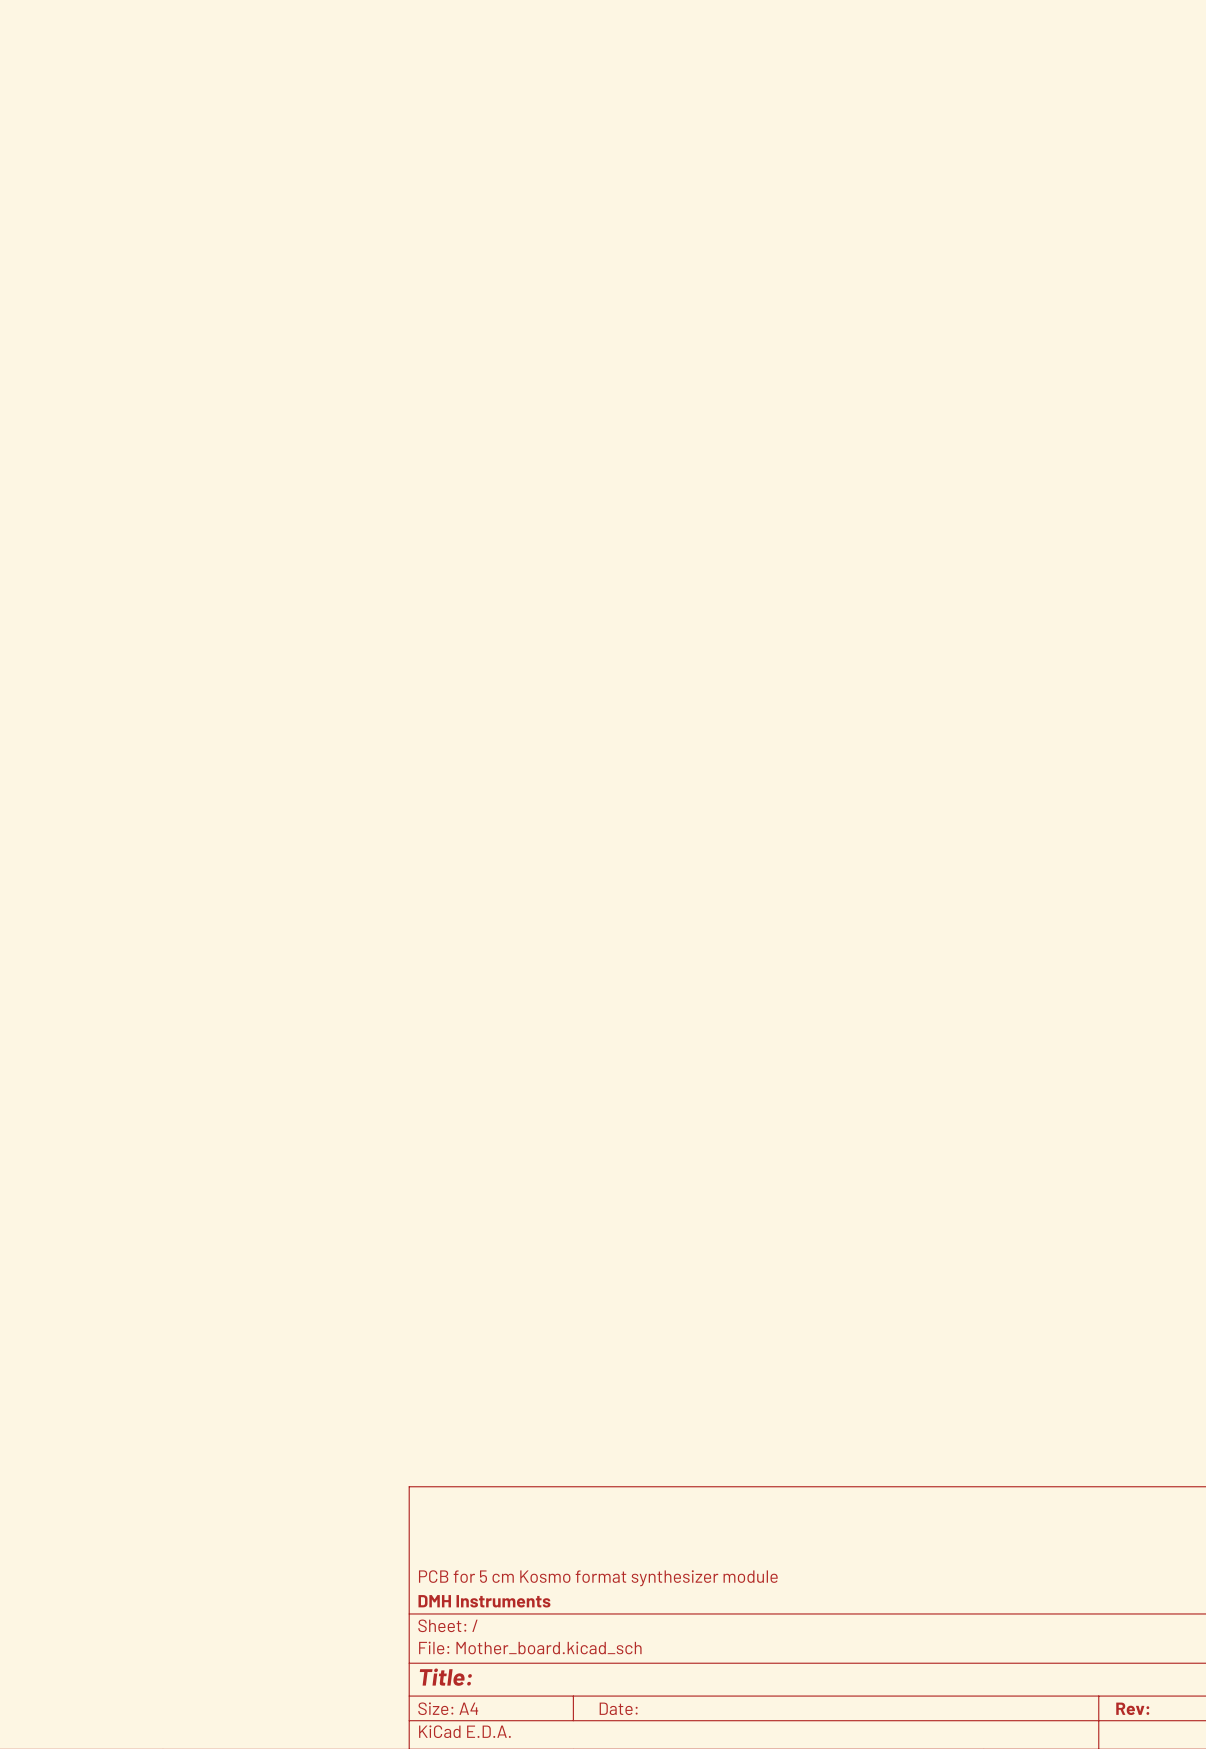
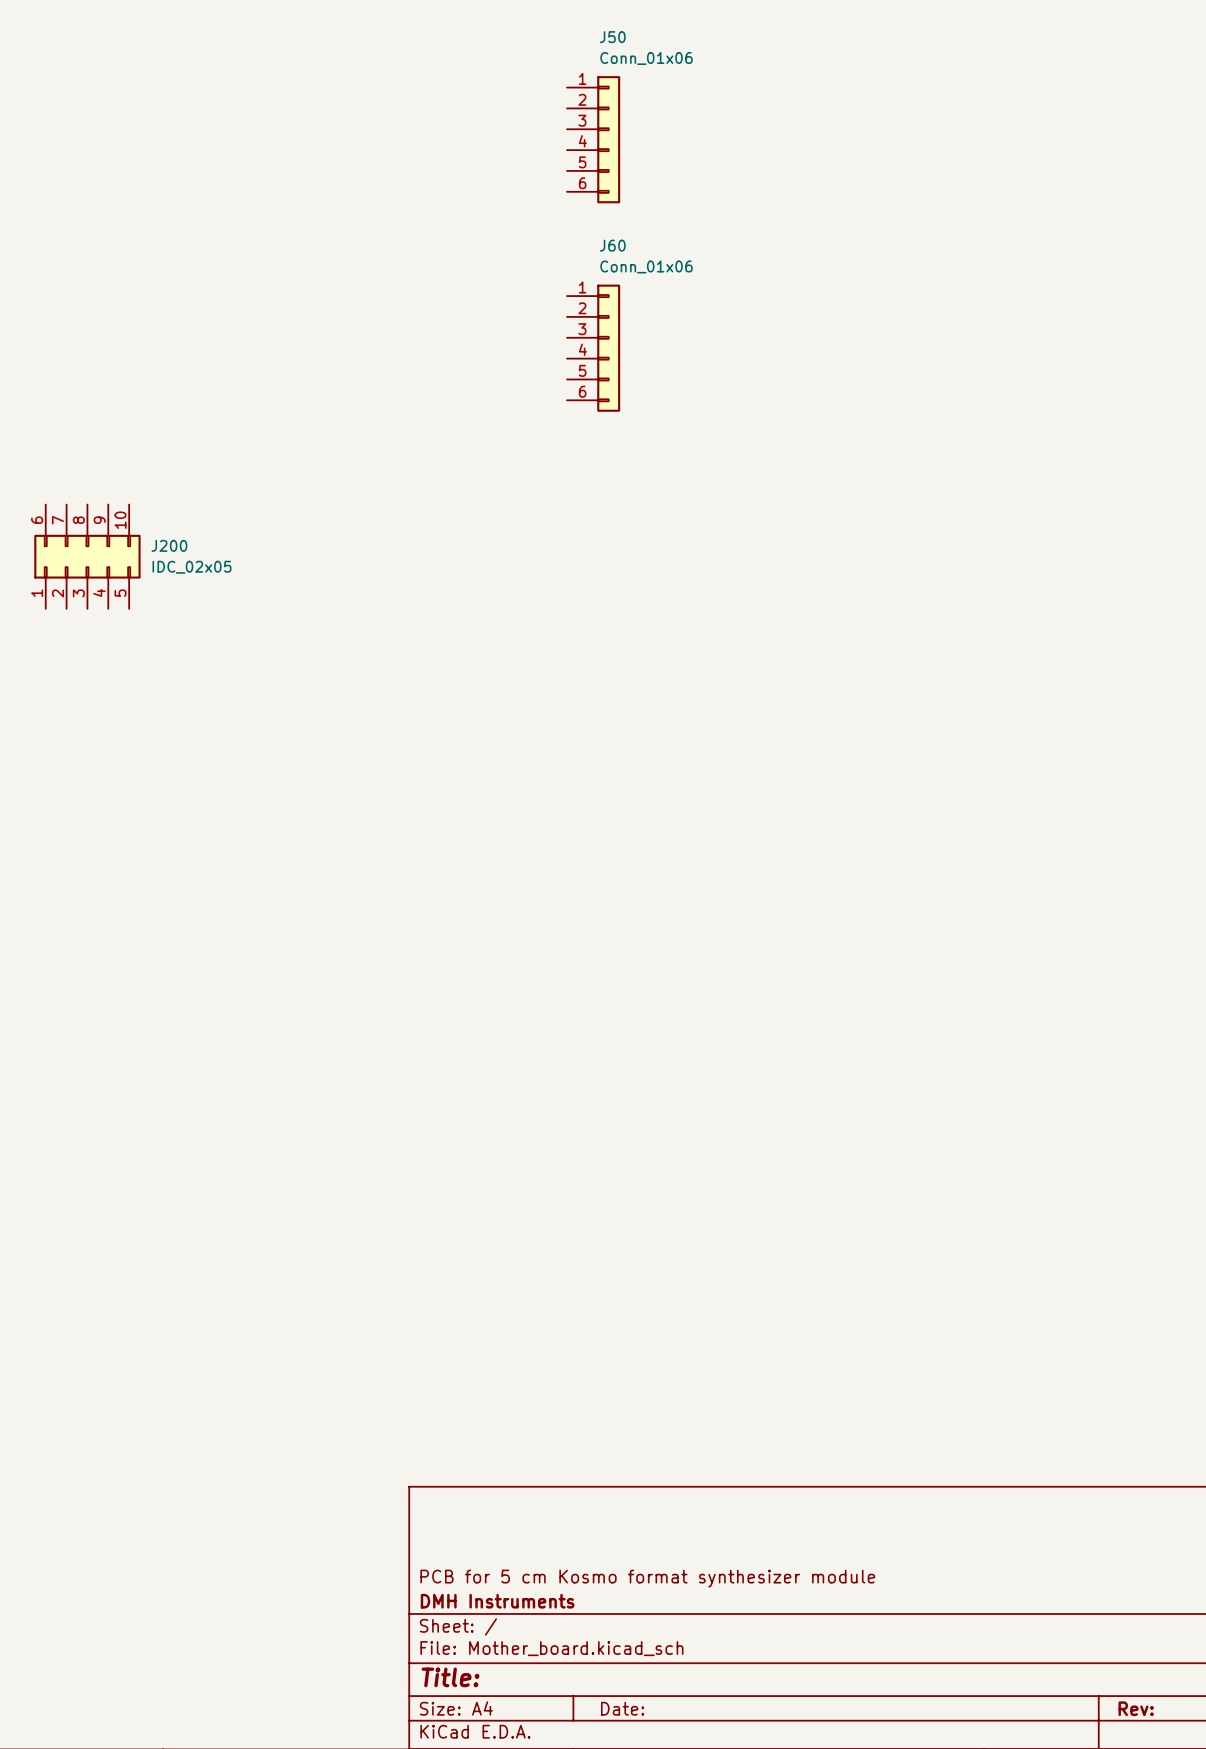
J50: none -> Conn_01x06 (593, 139)
J60: none -> Conn_01x06 (593, 348)
J200: none -> IDC_02x05 (87, 556)

